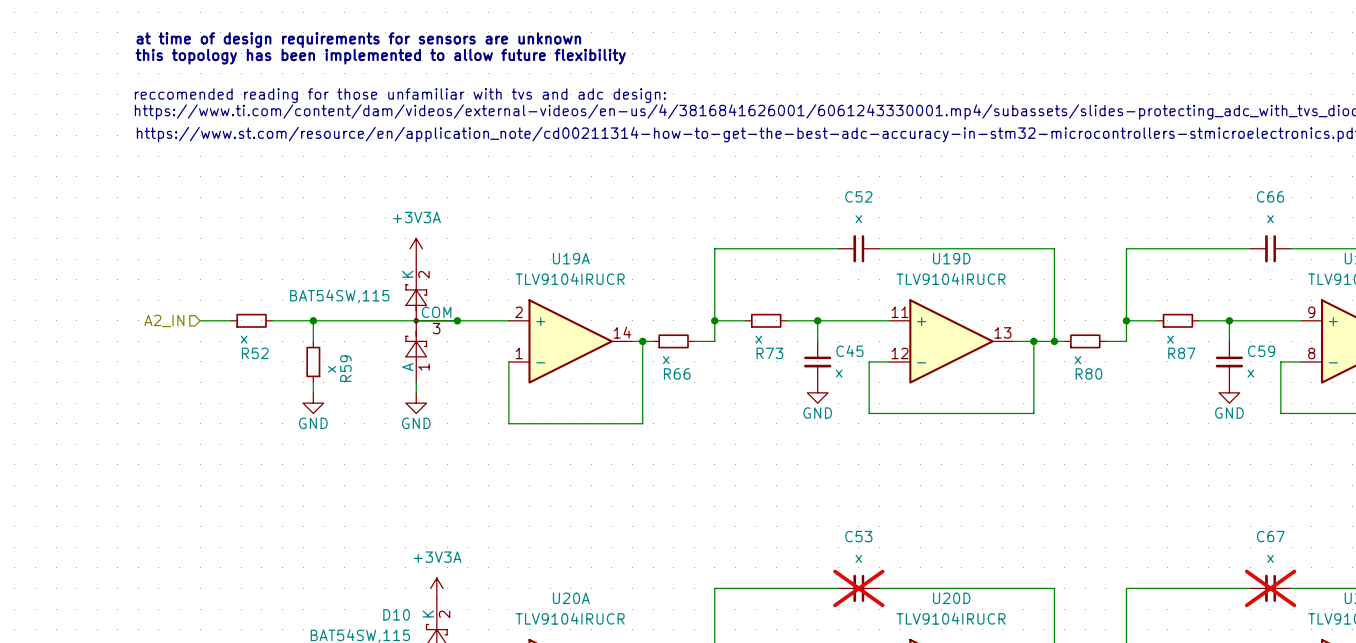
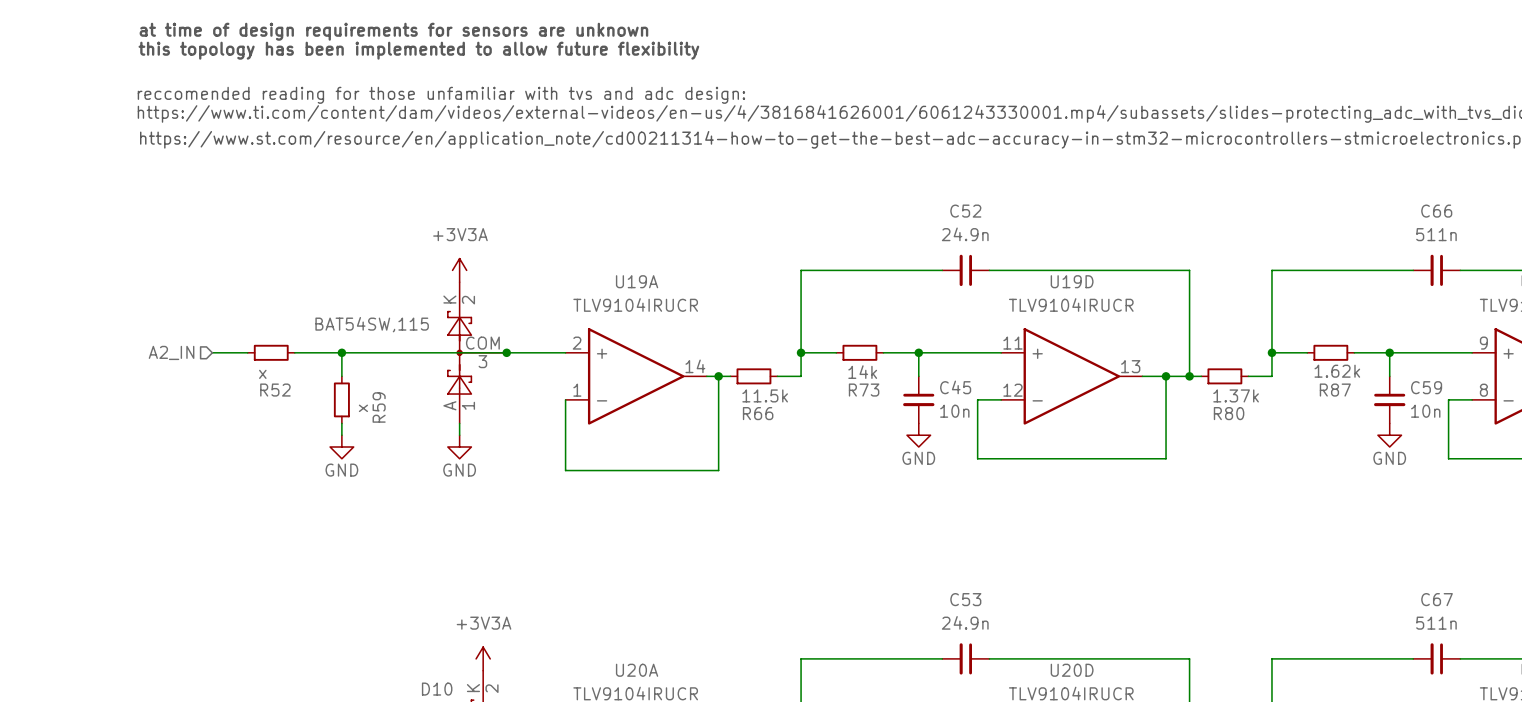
C52 value: x (858, 219) -> 24.9n (965, 234)
C66 value: x (1270, 219) -> 511n (1436, 234)
R73 value: x (758, 339) -> 14k (862, 372)
R87 value: x (1170, 339) -> 1.62k (1337, 371)
R66 value: x (666, 360) -> 11.5k (765, 395)
R80 value: x (1077, 360) -> 1.37k (1236, 395)
C45 value: x (839, 373) -> 10n (954, 411)
C59 value: x (1250, 373) -> 10n (1425, 411)
C53 value: x (858, 558) -> 24.9n (965, 622)
C67 value: x (1270, 558) -> 511n (1436, 623)
C53 do-not-place cross: (858, 588) -> none
C67 do-not-place cross: (1270, 588) -> none

